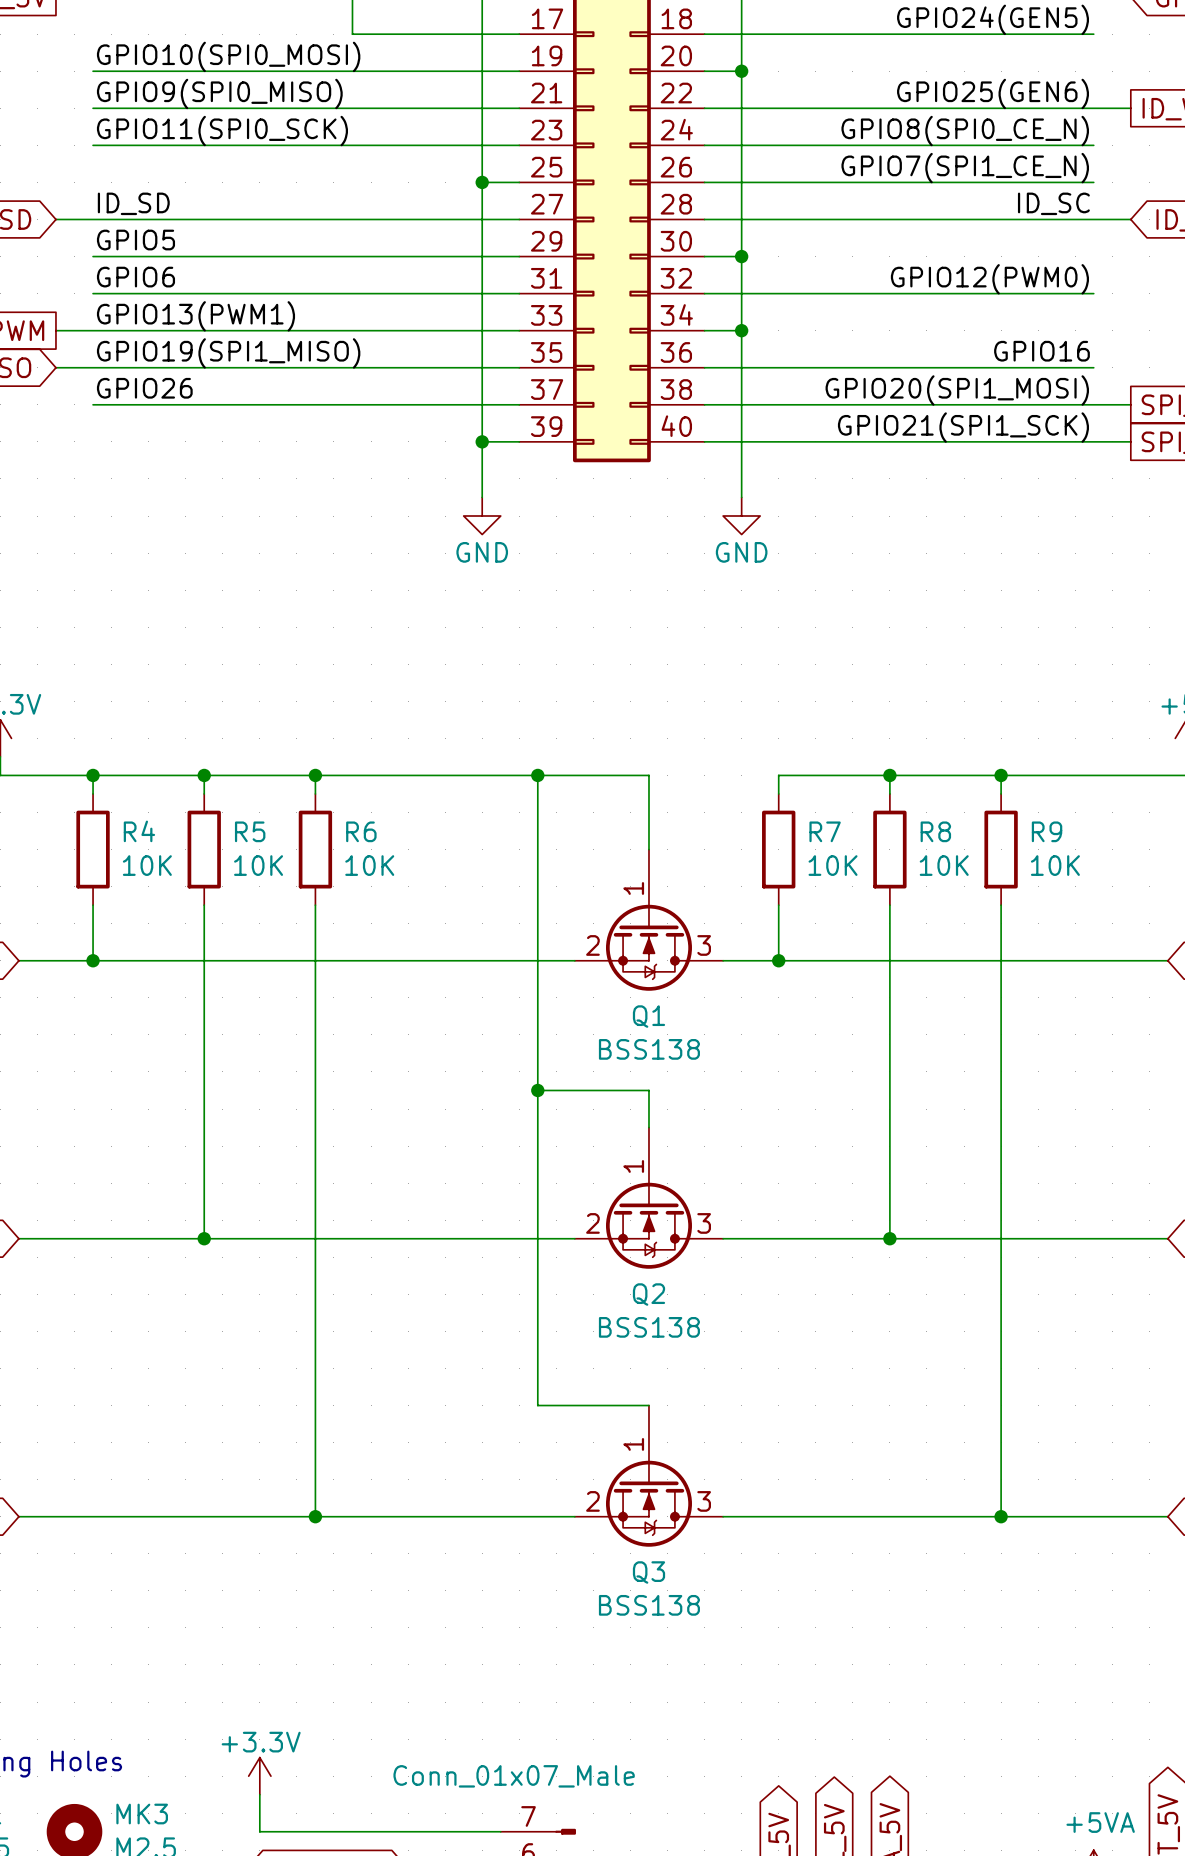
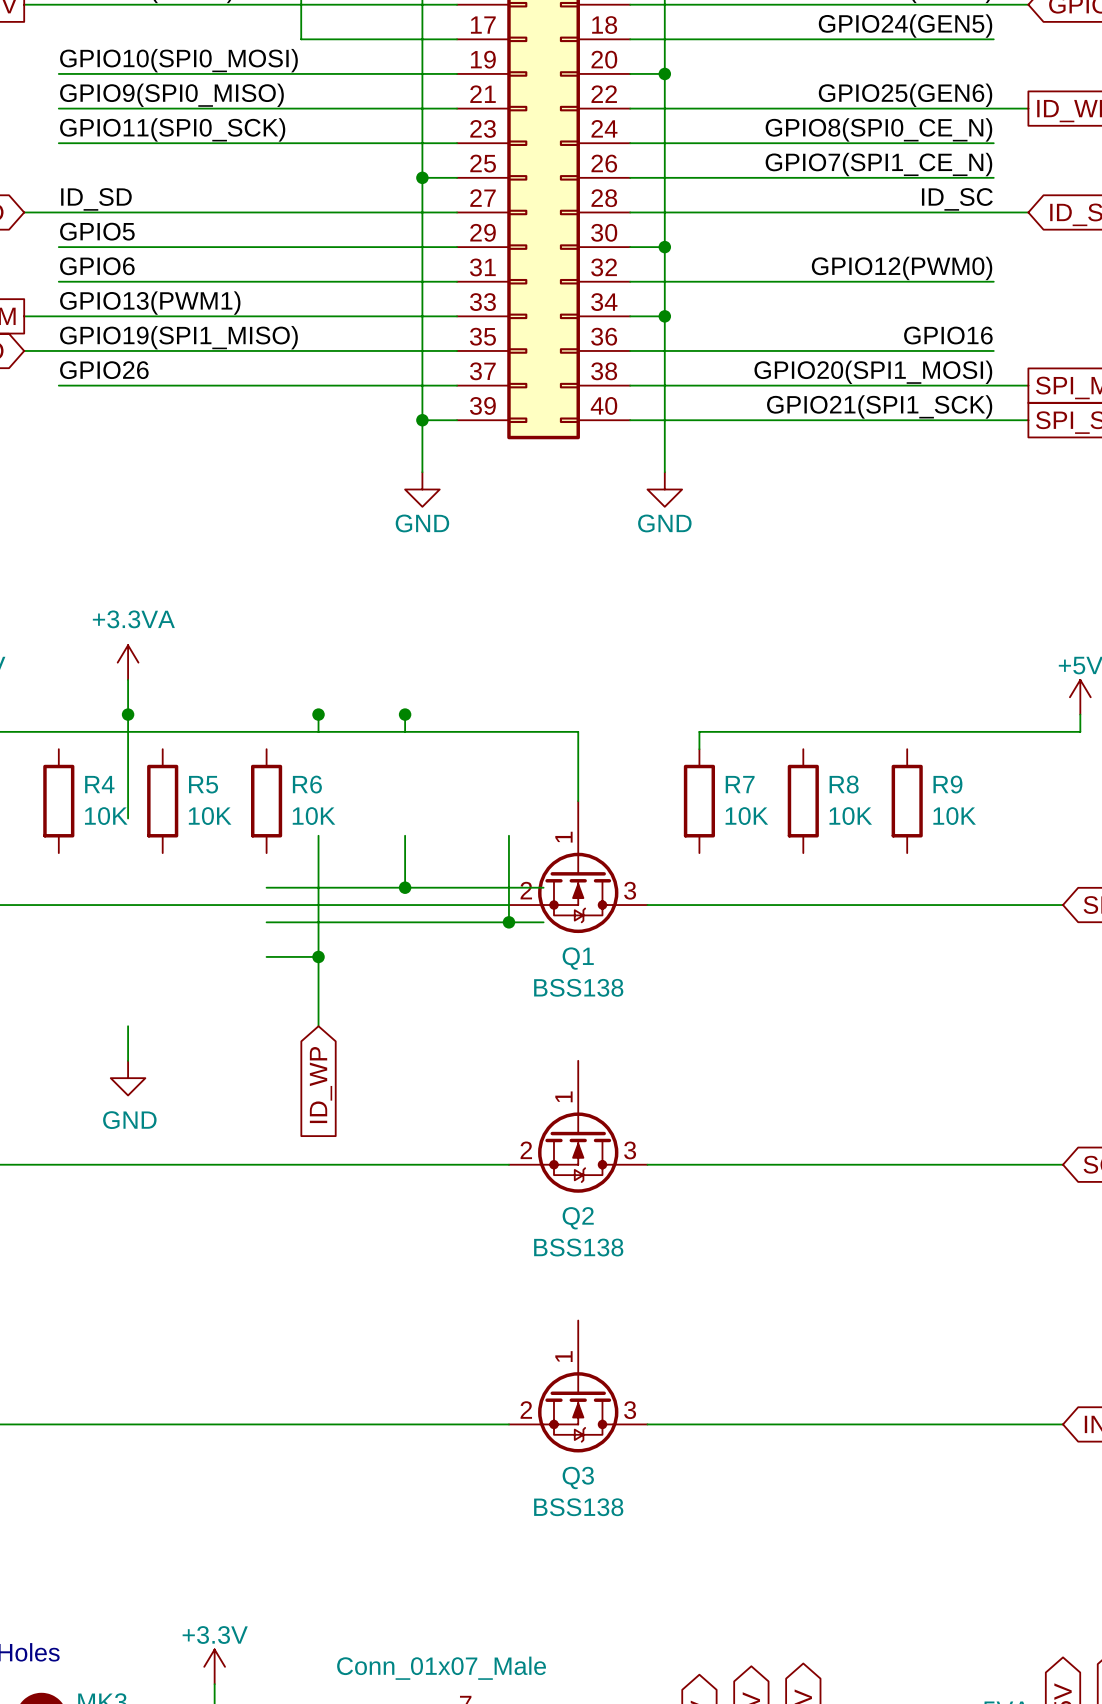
power symbol: none -> +3.3VA (128, 662)
wire: none -> (128, 679) (128, 818)
junction: none -> (128, 714)
junction: none -> (405, 714)
wire: (93, 775) (93, 793) -> none
junction: (93, 775) -> none
wire: (204, 775) (204, 793) -> (405, 714) (405, 731)
junction: (204, 775) -> none
wire: (315, 775) (315, 793) -> (318, 714) (318, 731)
junction position: (315, 775) -> (318, 714)
wire: (537, 775) (537, 1405) (648, 1405) -> none
junction: (537, 775) -> none
wire: (889, 775) (889, 793) -> none
junction: (889, 775) -> none
wire: (1001, 775) (1001, 793) -> none
junction: (1001, 775) -> none
wire: none -> (318, 835) (318, 1026)
wire: none -> (508, 835) (508, 922)
wire: (93, 905) (93, 960) -> none
wire: (204, 905) (204, 1238) -> none
wire: (315, 905) (315, 1516) -> none
wire: (778, 905) (778, 960) -> (405, 835) (405, 887)
wire: (889, 905) (889, 1238) -> none
wire: (1001, 905) (1001, 1516) -> none
wire: none -> (266, 887) (543, 887)
junction: none -> (405, 887)
junction: (93, 960) -> none
junction: (778, 960) -> none
wire: none -> (266, 922) (543, 922)
junction: none -> (508, 922)
wire: none -> (266, 956) (318, 956)
junction: none -> (318, 956)
wire: none -> (128, 1026) (128, 1060)
wire: (537, 1090) (648, 1090) (648, 1127) -> none
junction: (537, 1090) -> none
power symbol: none -> GND (128, 1078)
global label: none -> ID_WP (321, 1085)
junction: (204, 1238) -> none
junction: (889, 1238) -> none
junction: (315, 1516) -> none
junction: (1001, 1516) -> none

